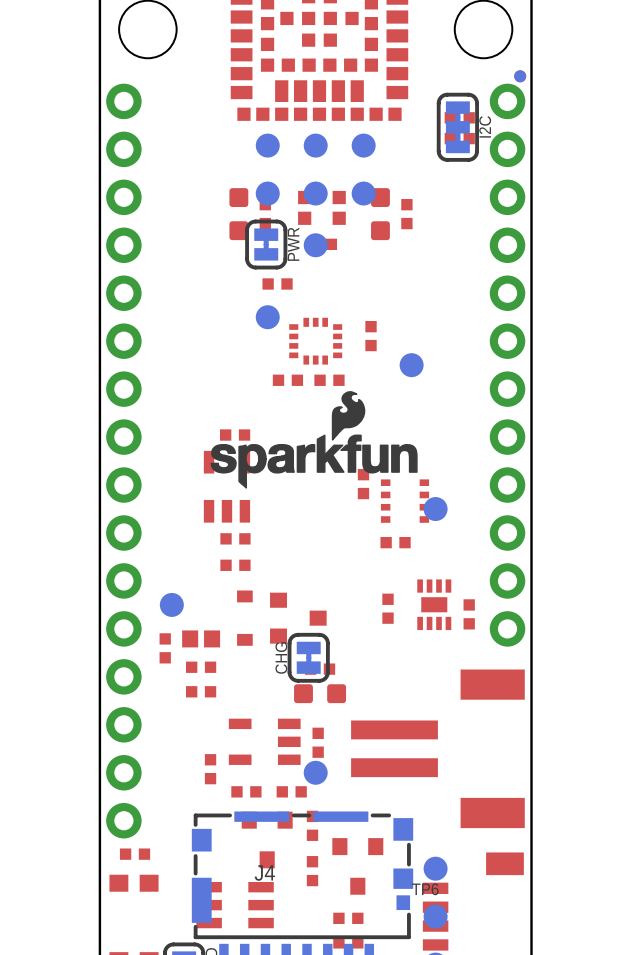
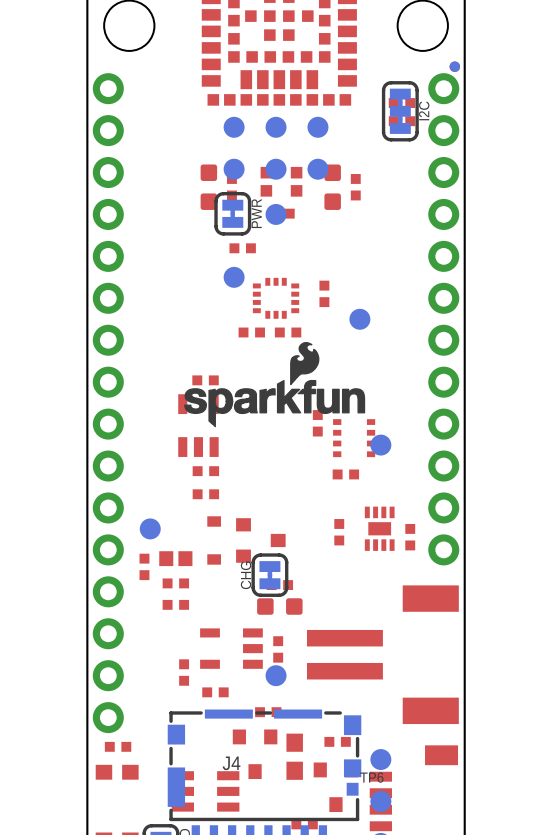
part: (291, 791) -> none
part rotation: 0° (312, 825) -> 90° clockwise (268, 712)
part: (267, 839) -> none
part: none -> (337, 741)
part: none -> (255, 754)
part: none -> (294, 756)
part: (357, 866) -> none
part: (312, 871) -> none
part: none -> (335, 787)
part: (348, 918) -> none

